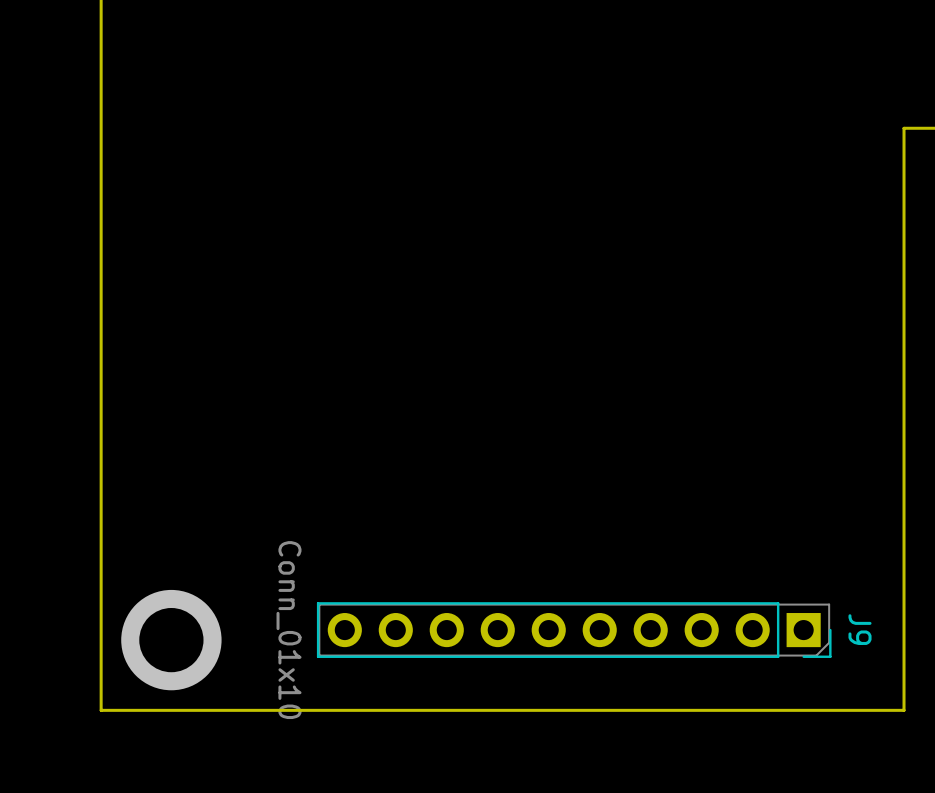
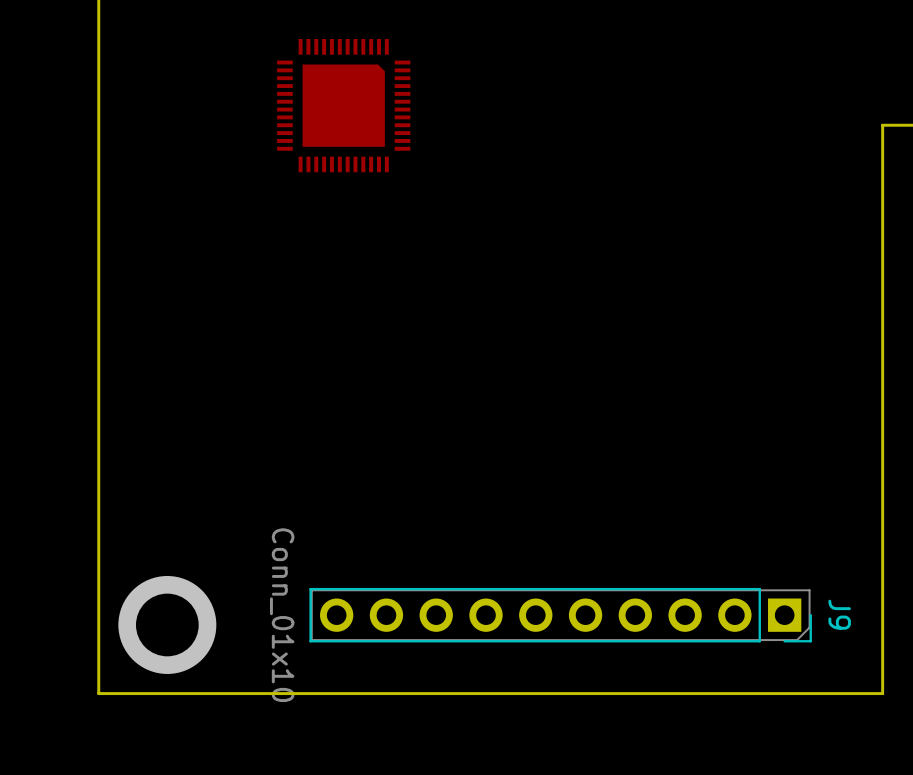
part: none -> (343, 105)

